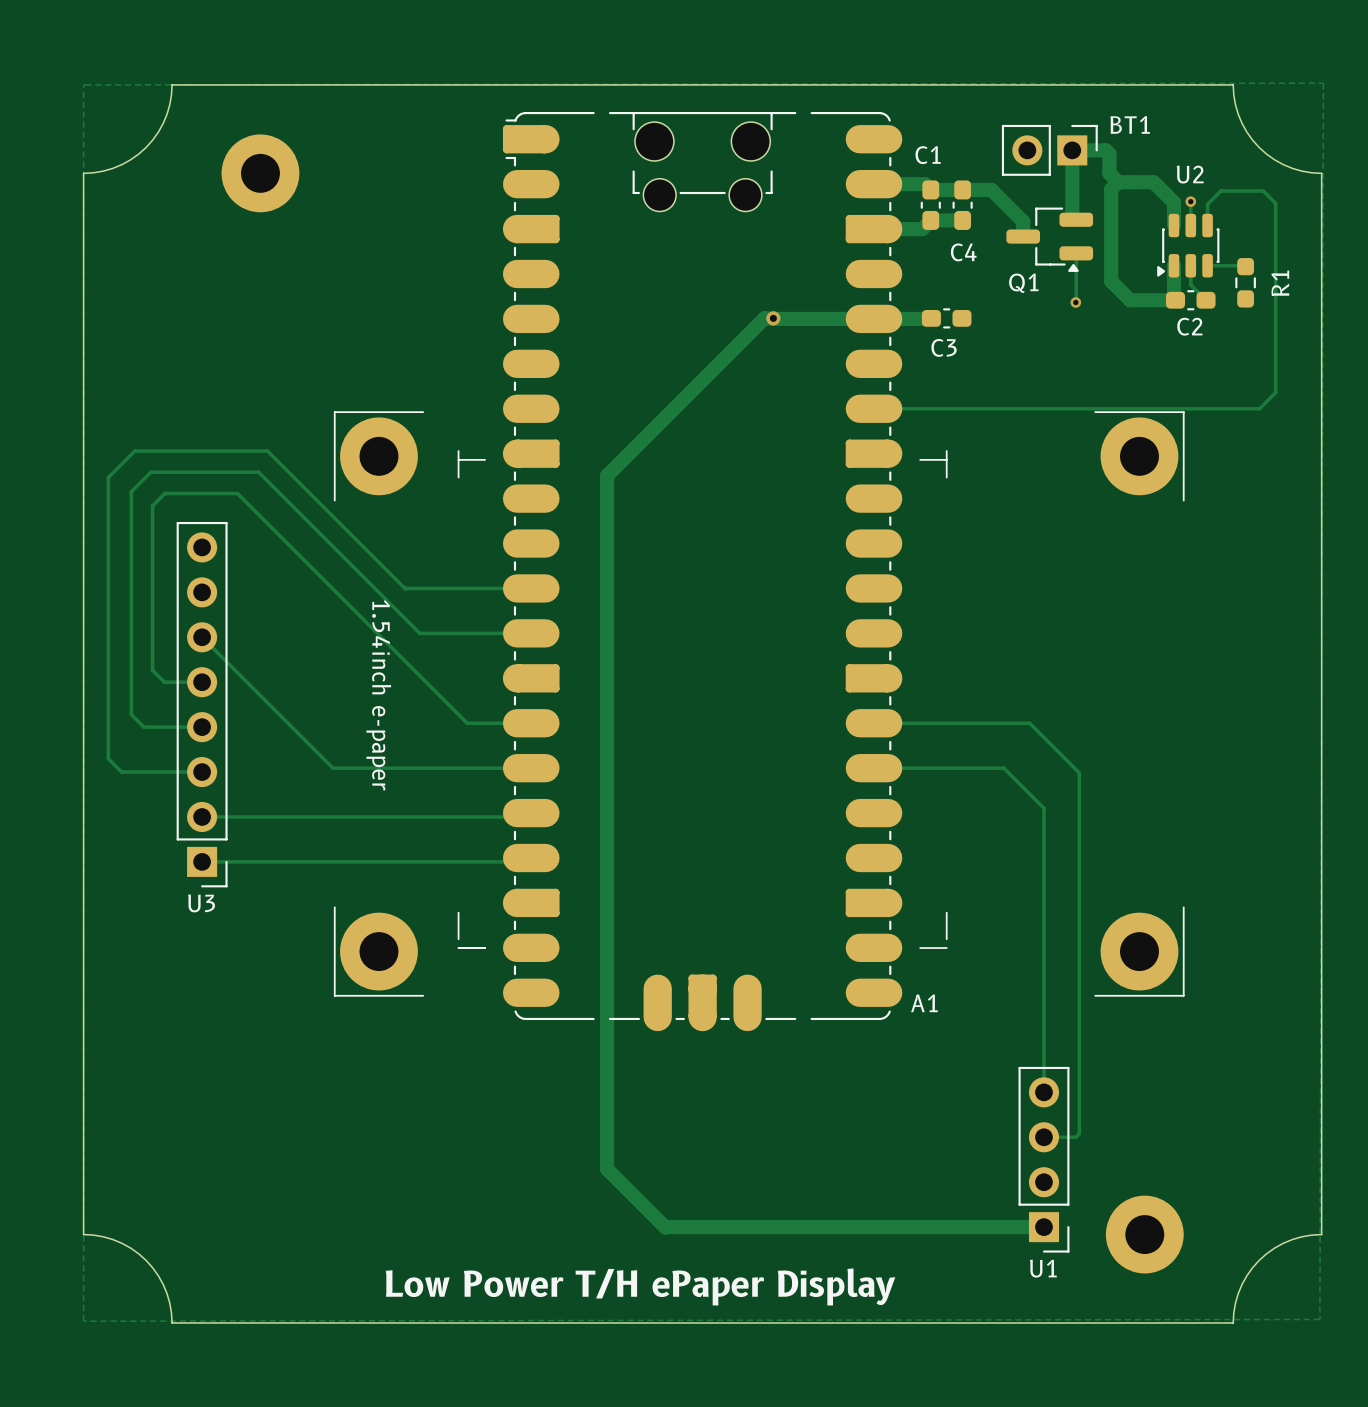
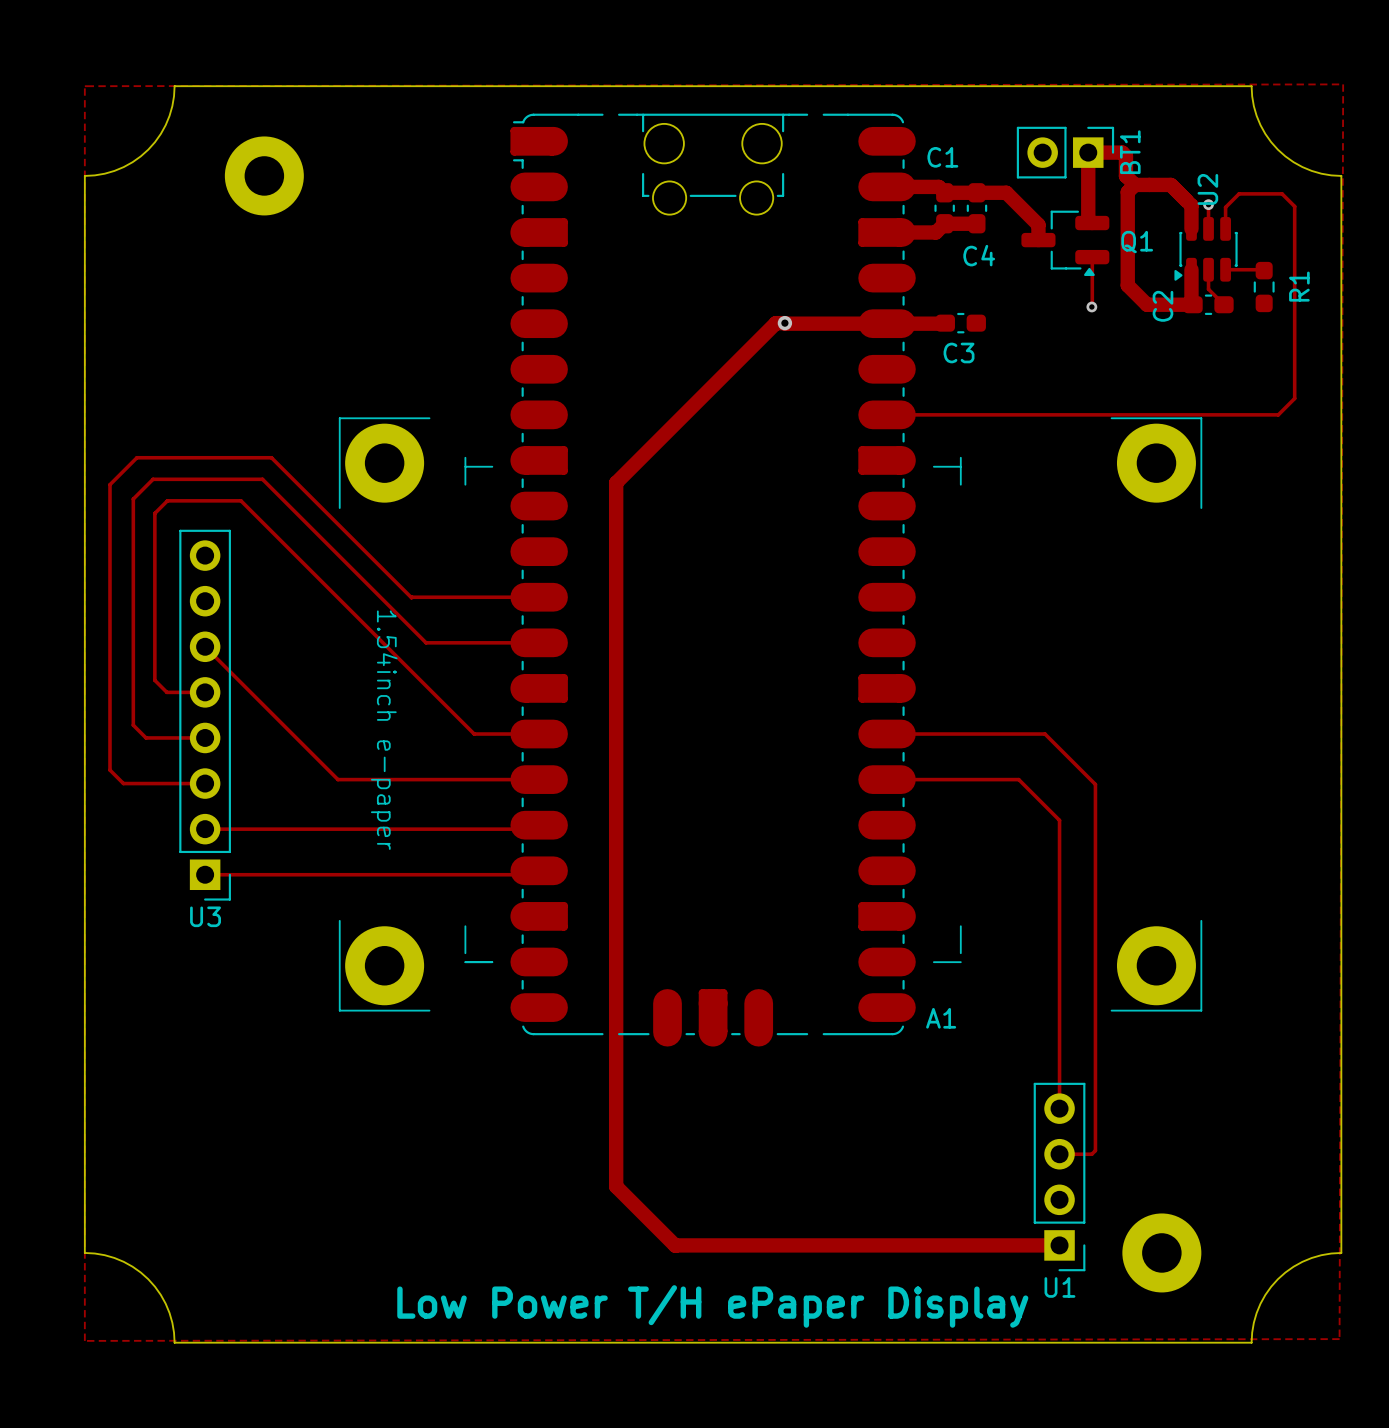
BT1 name rotation: 0° (1130, 124) -> 90° counterclockwise (1130, 152)
U2 name rotation: 0° (1190, 174) -> 90° counterclockwise (1207, 189)
Q1 name position: Q1 (1023, 283) -> Q1 (1137, 242)
C2 name rotation: 0° (1189, 326) -> 90° counterclockwise (1162, 306)
C2 name position: C2 (1189, 326) -> C2 (1162, 306)

